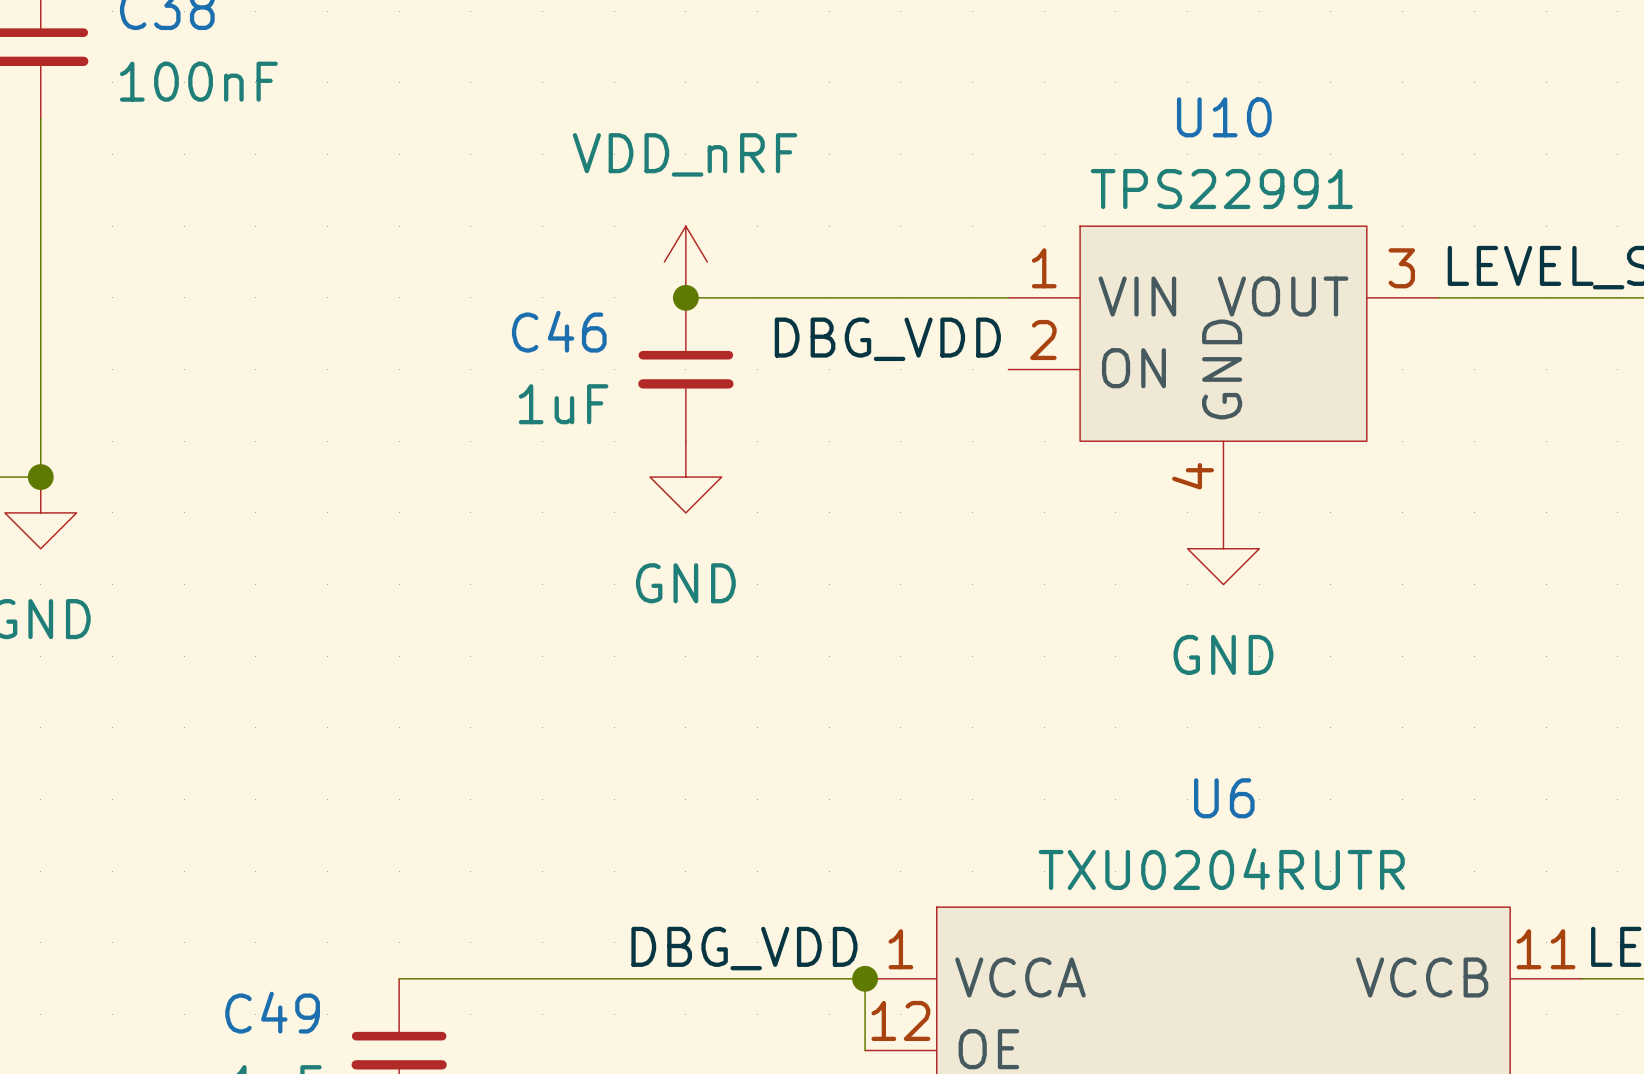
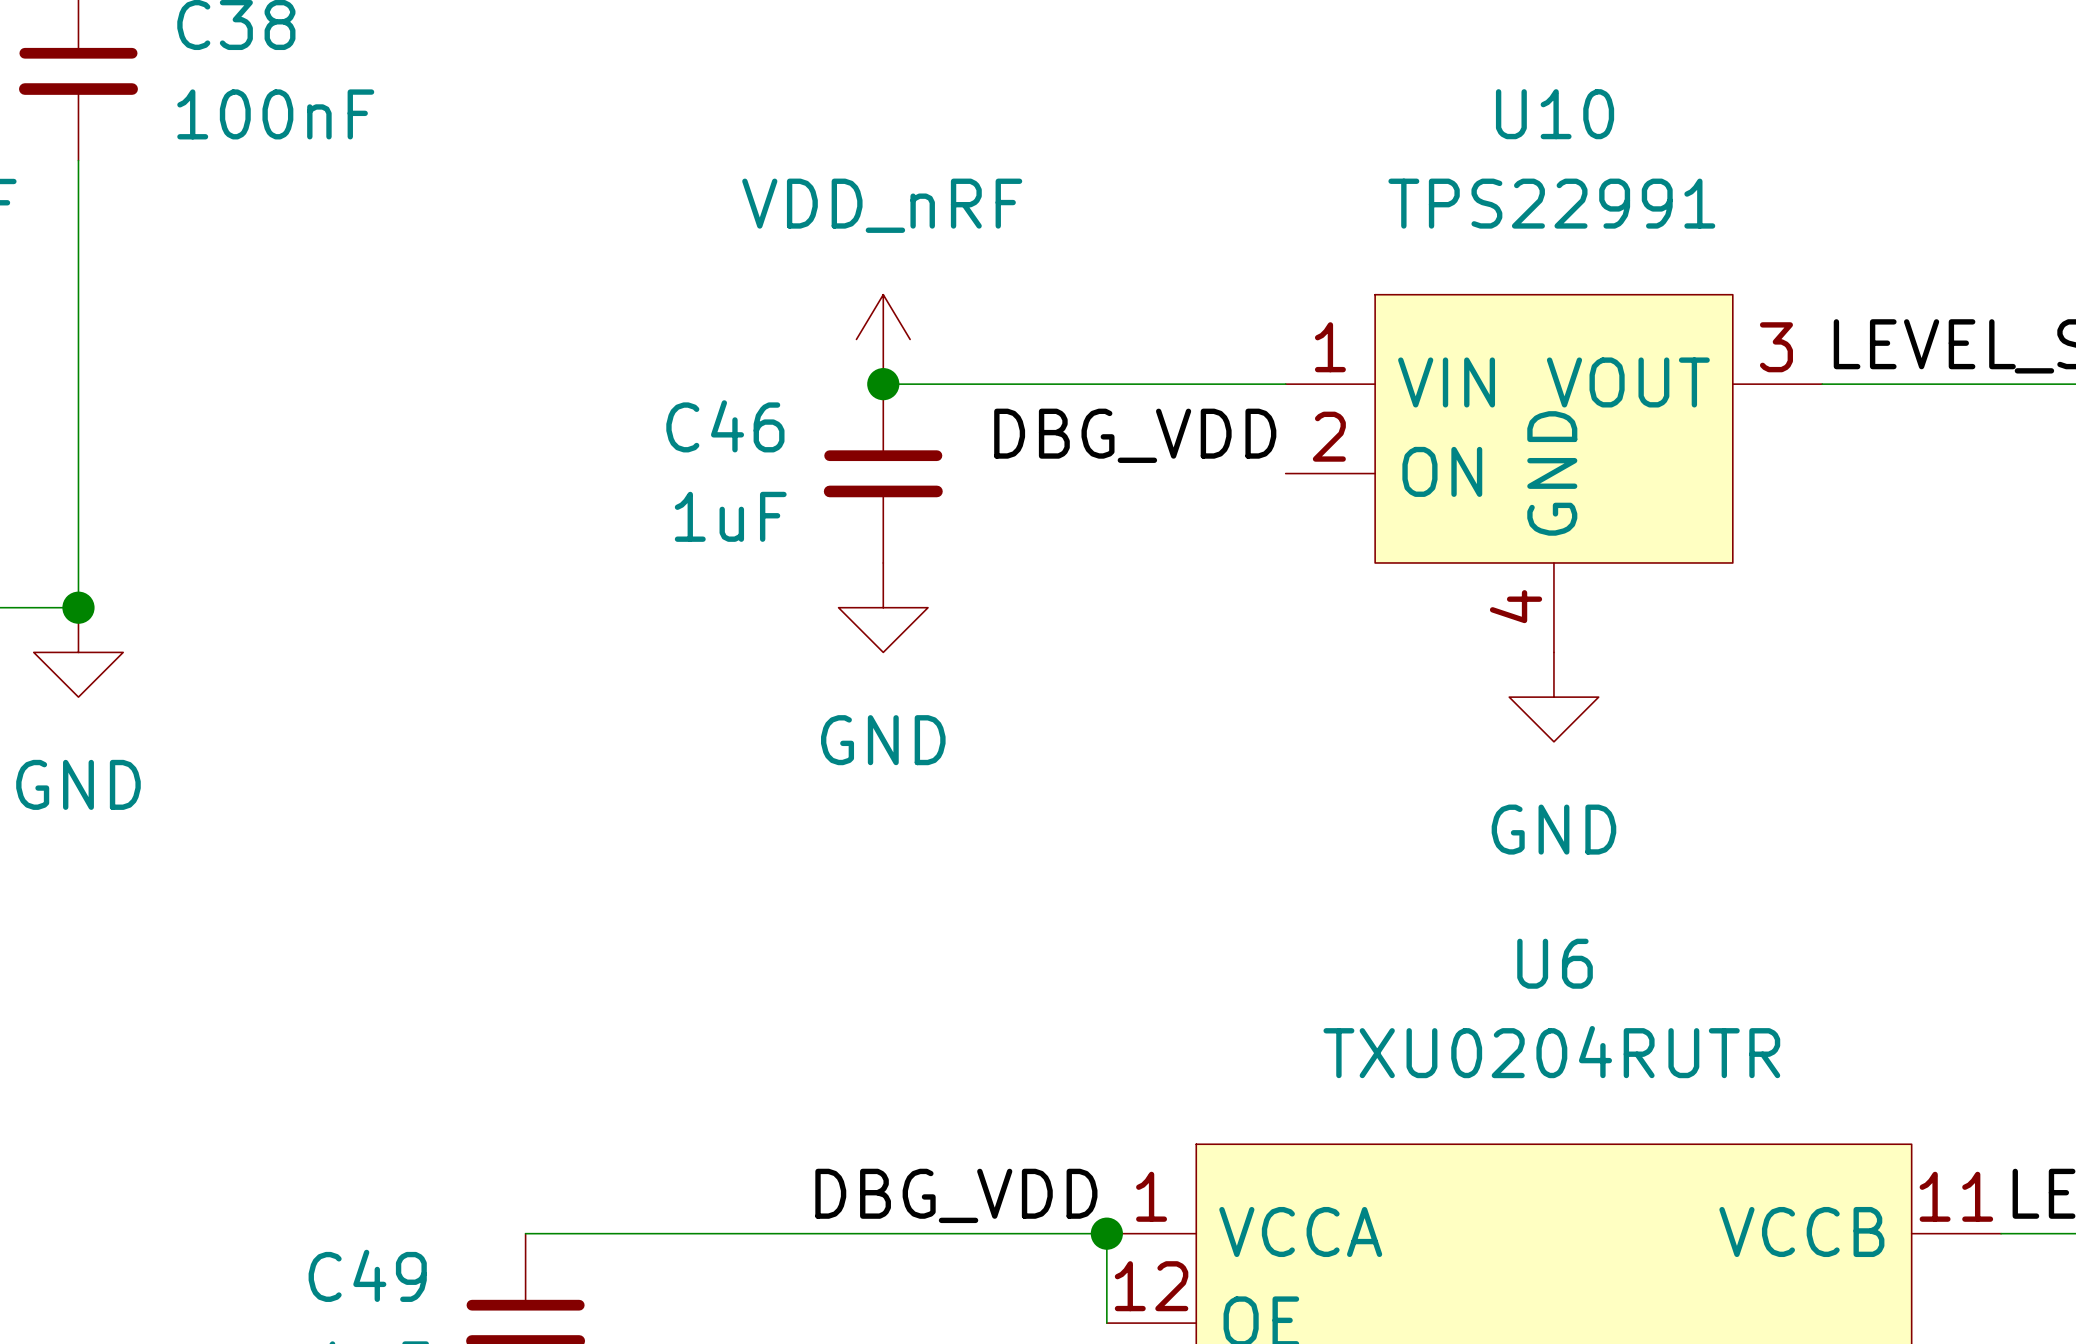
U10 name position: U10 (1224, 117) -> U10 (1555, 114)
U10 value position: TPS22991 (1221, 189) -> TPS22991 (1551, 203)
U6 name position: U6 (1224, 798) -> U6 (1555, 963)
U6 value position: TXU0204RUTR (1221, 869) -> TXU0204RUTR (1551, 1052)

